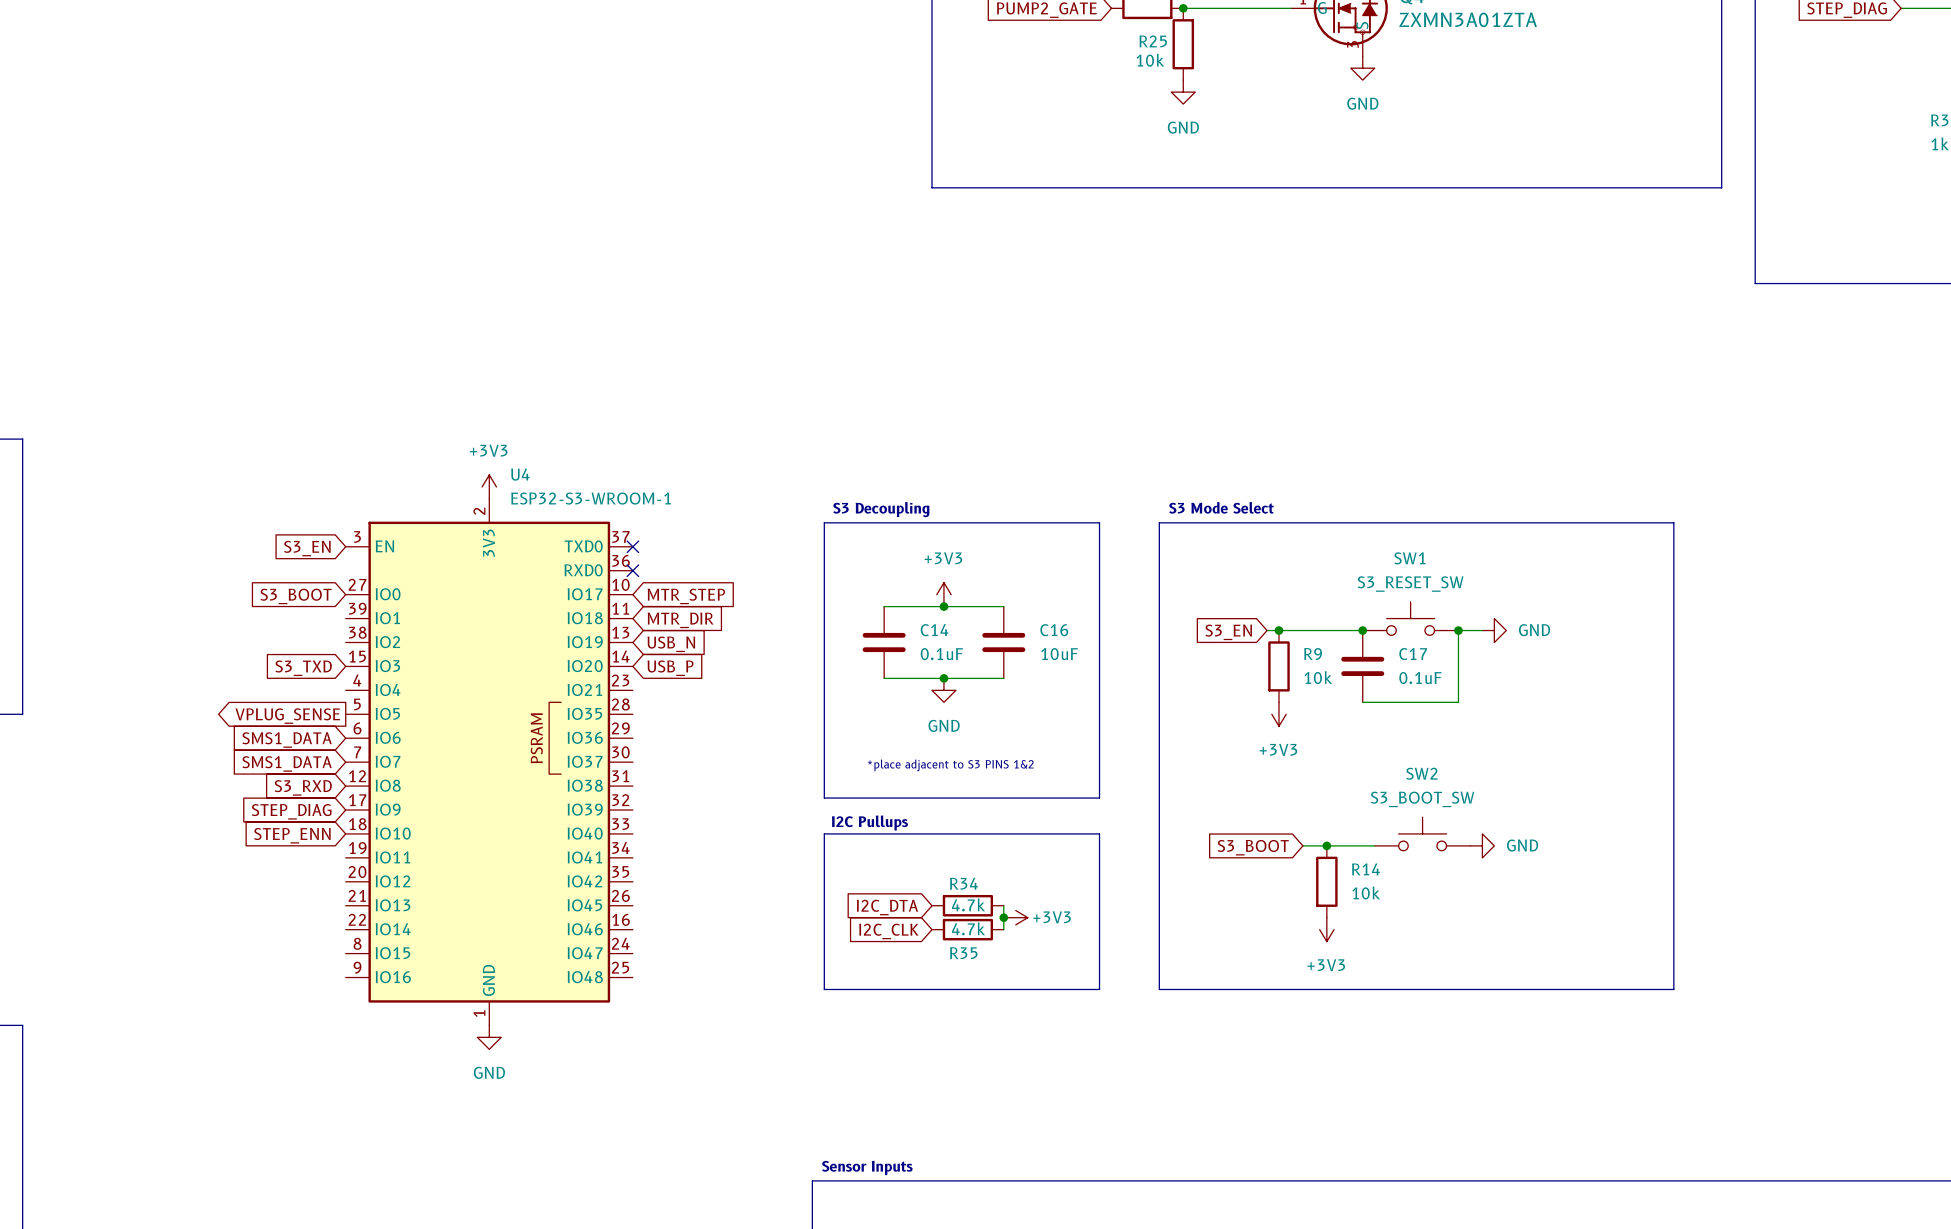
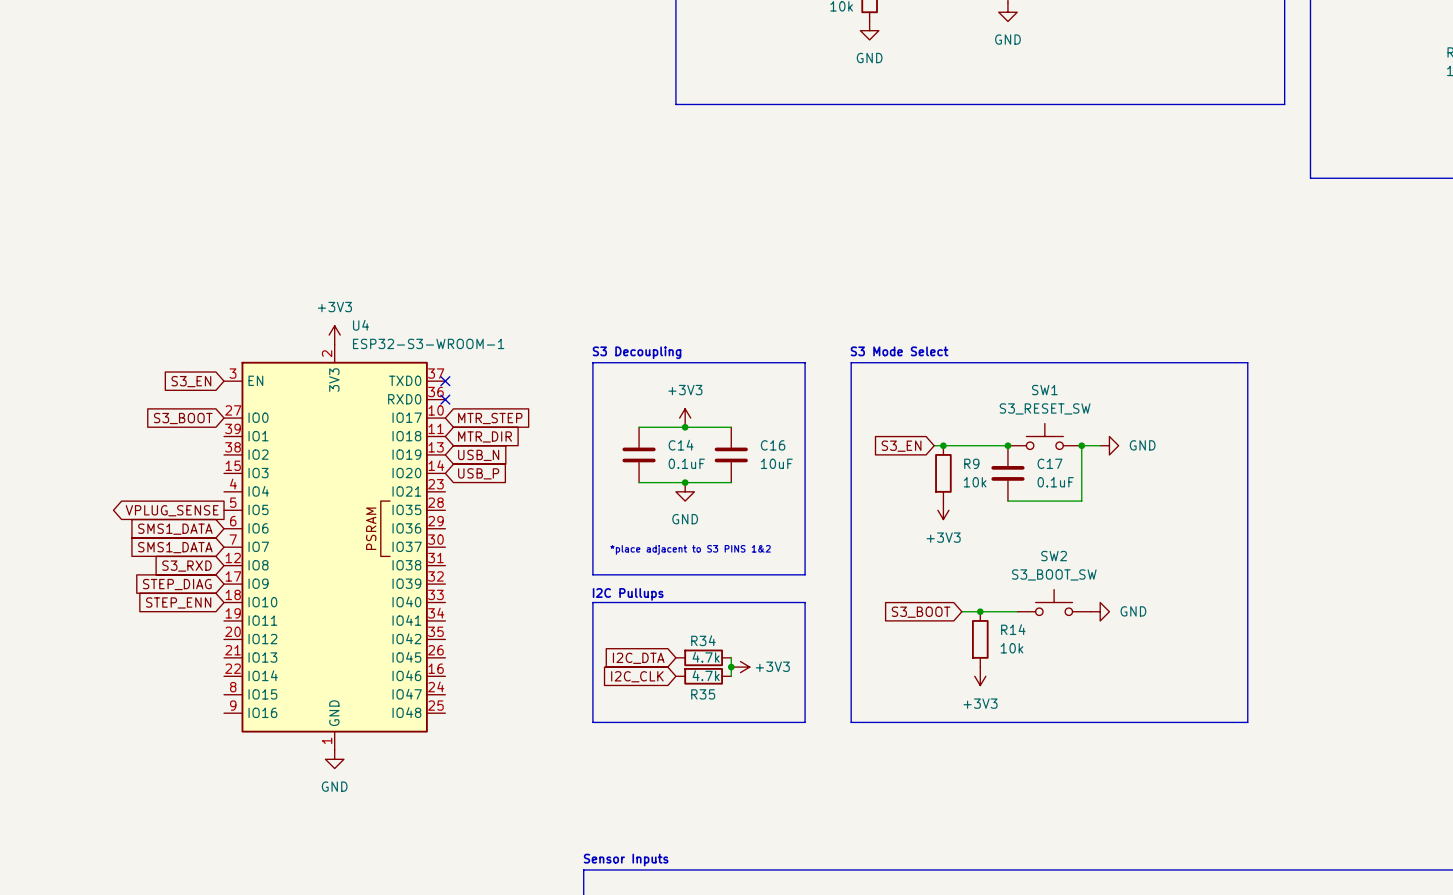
global label: S3_TXD (303, 668) -> none

